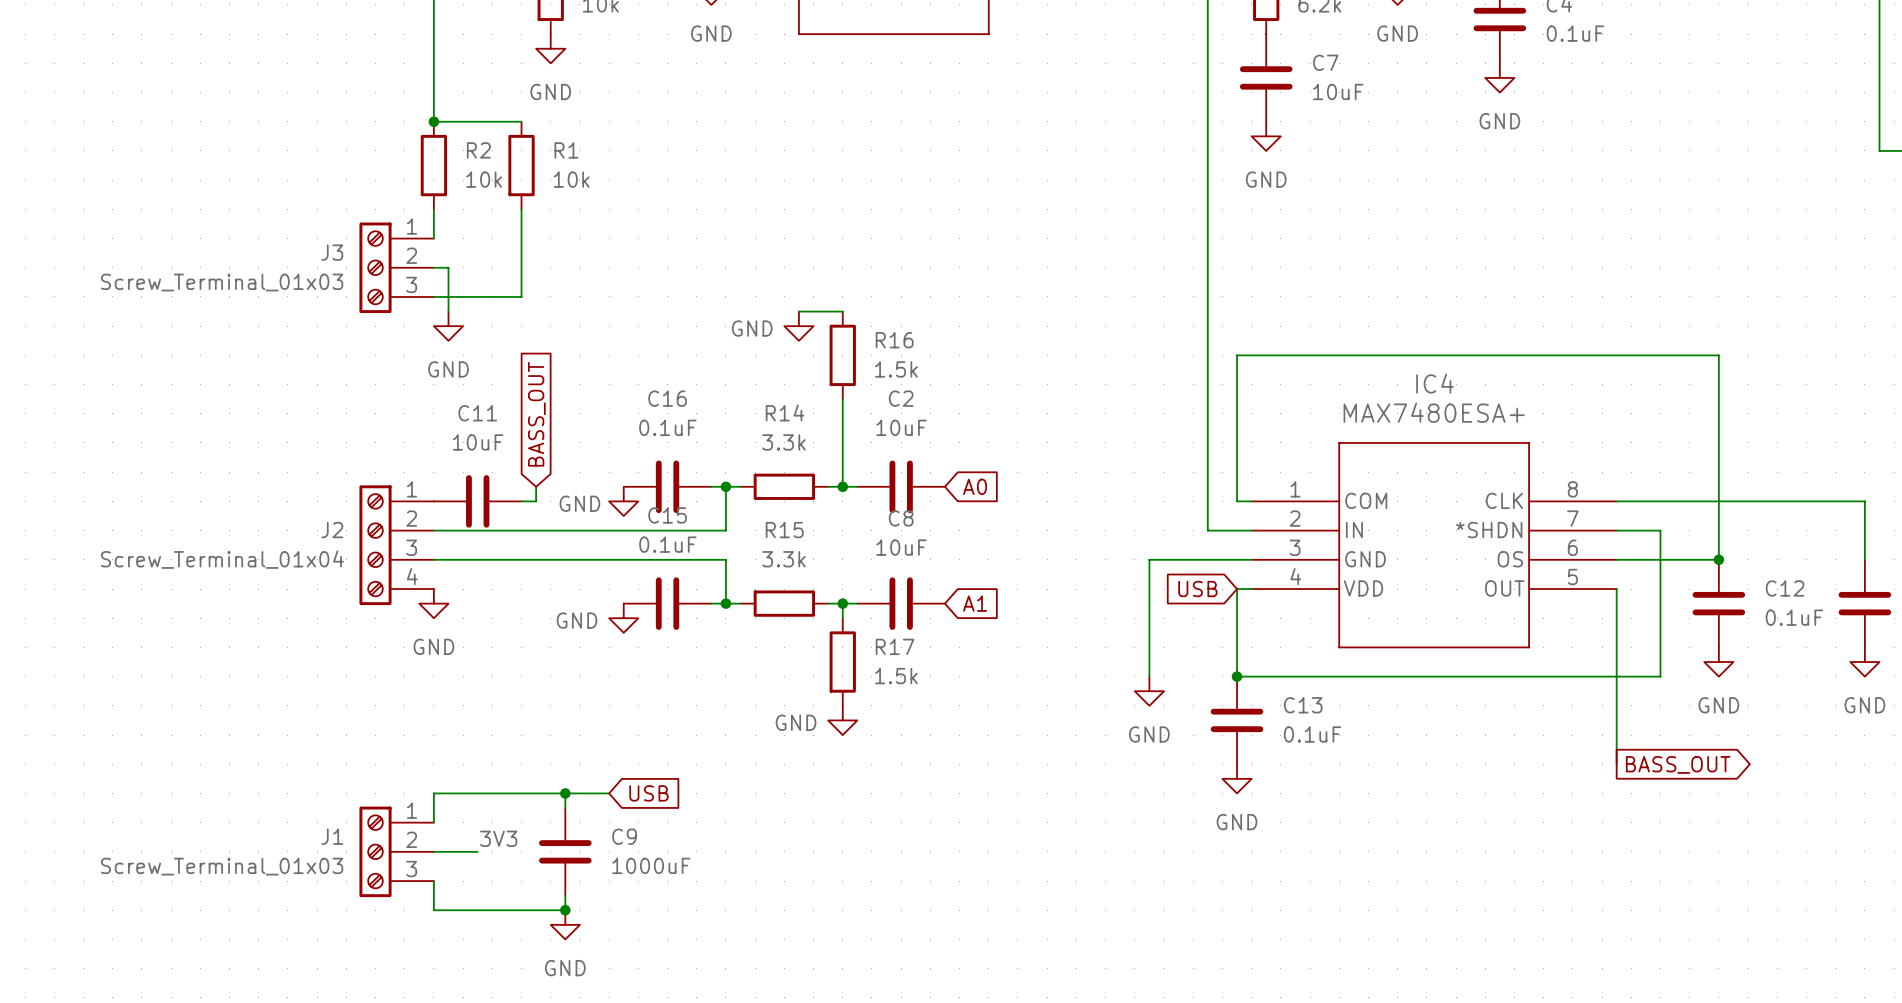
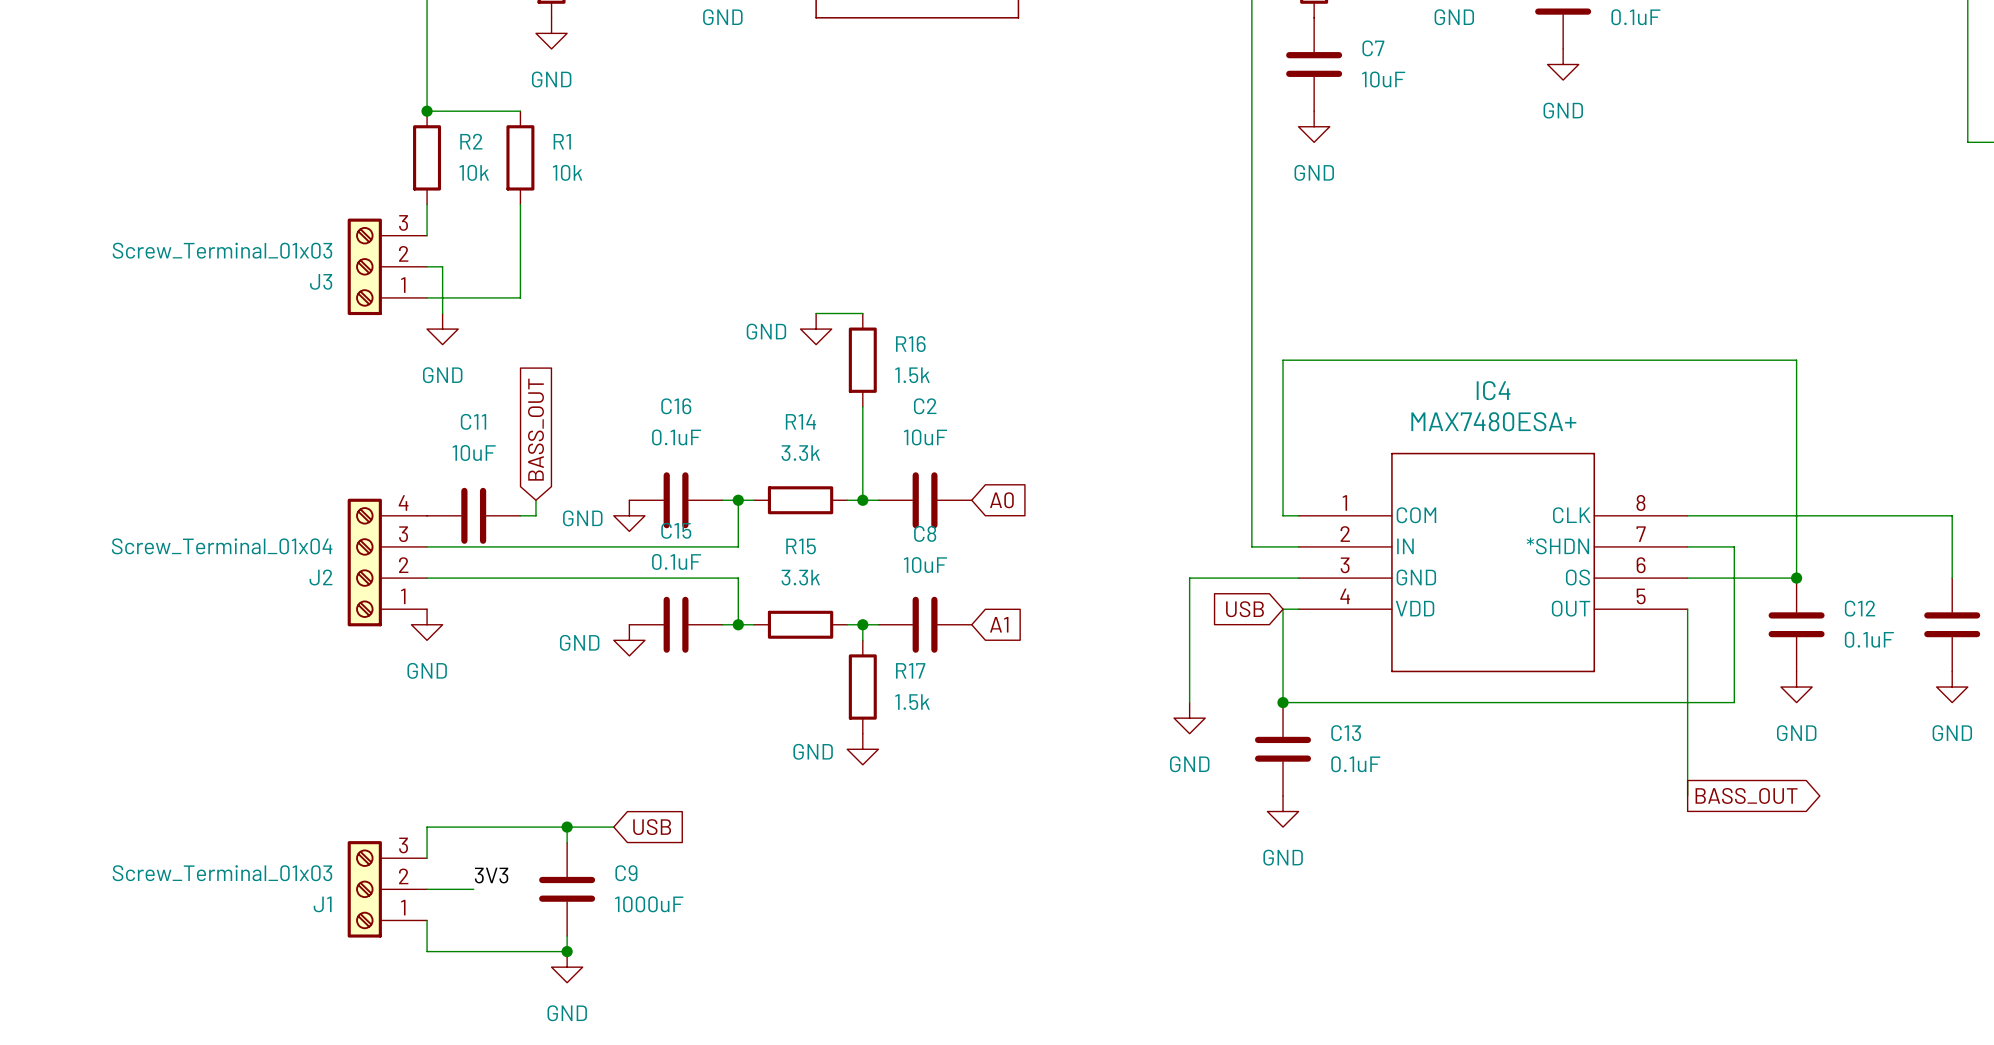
J3 flip: as is (375, 267) -> up-down (364, 266)
J2 flip: as is (375, 545) -> up-down (364, 562)
J1 flip: as is (375, 851) -> up-down (364, 889)

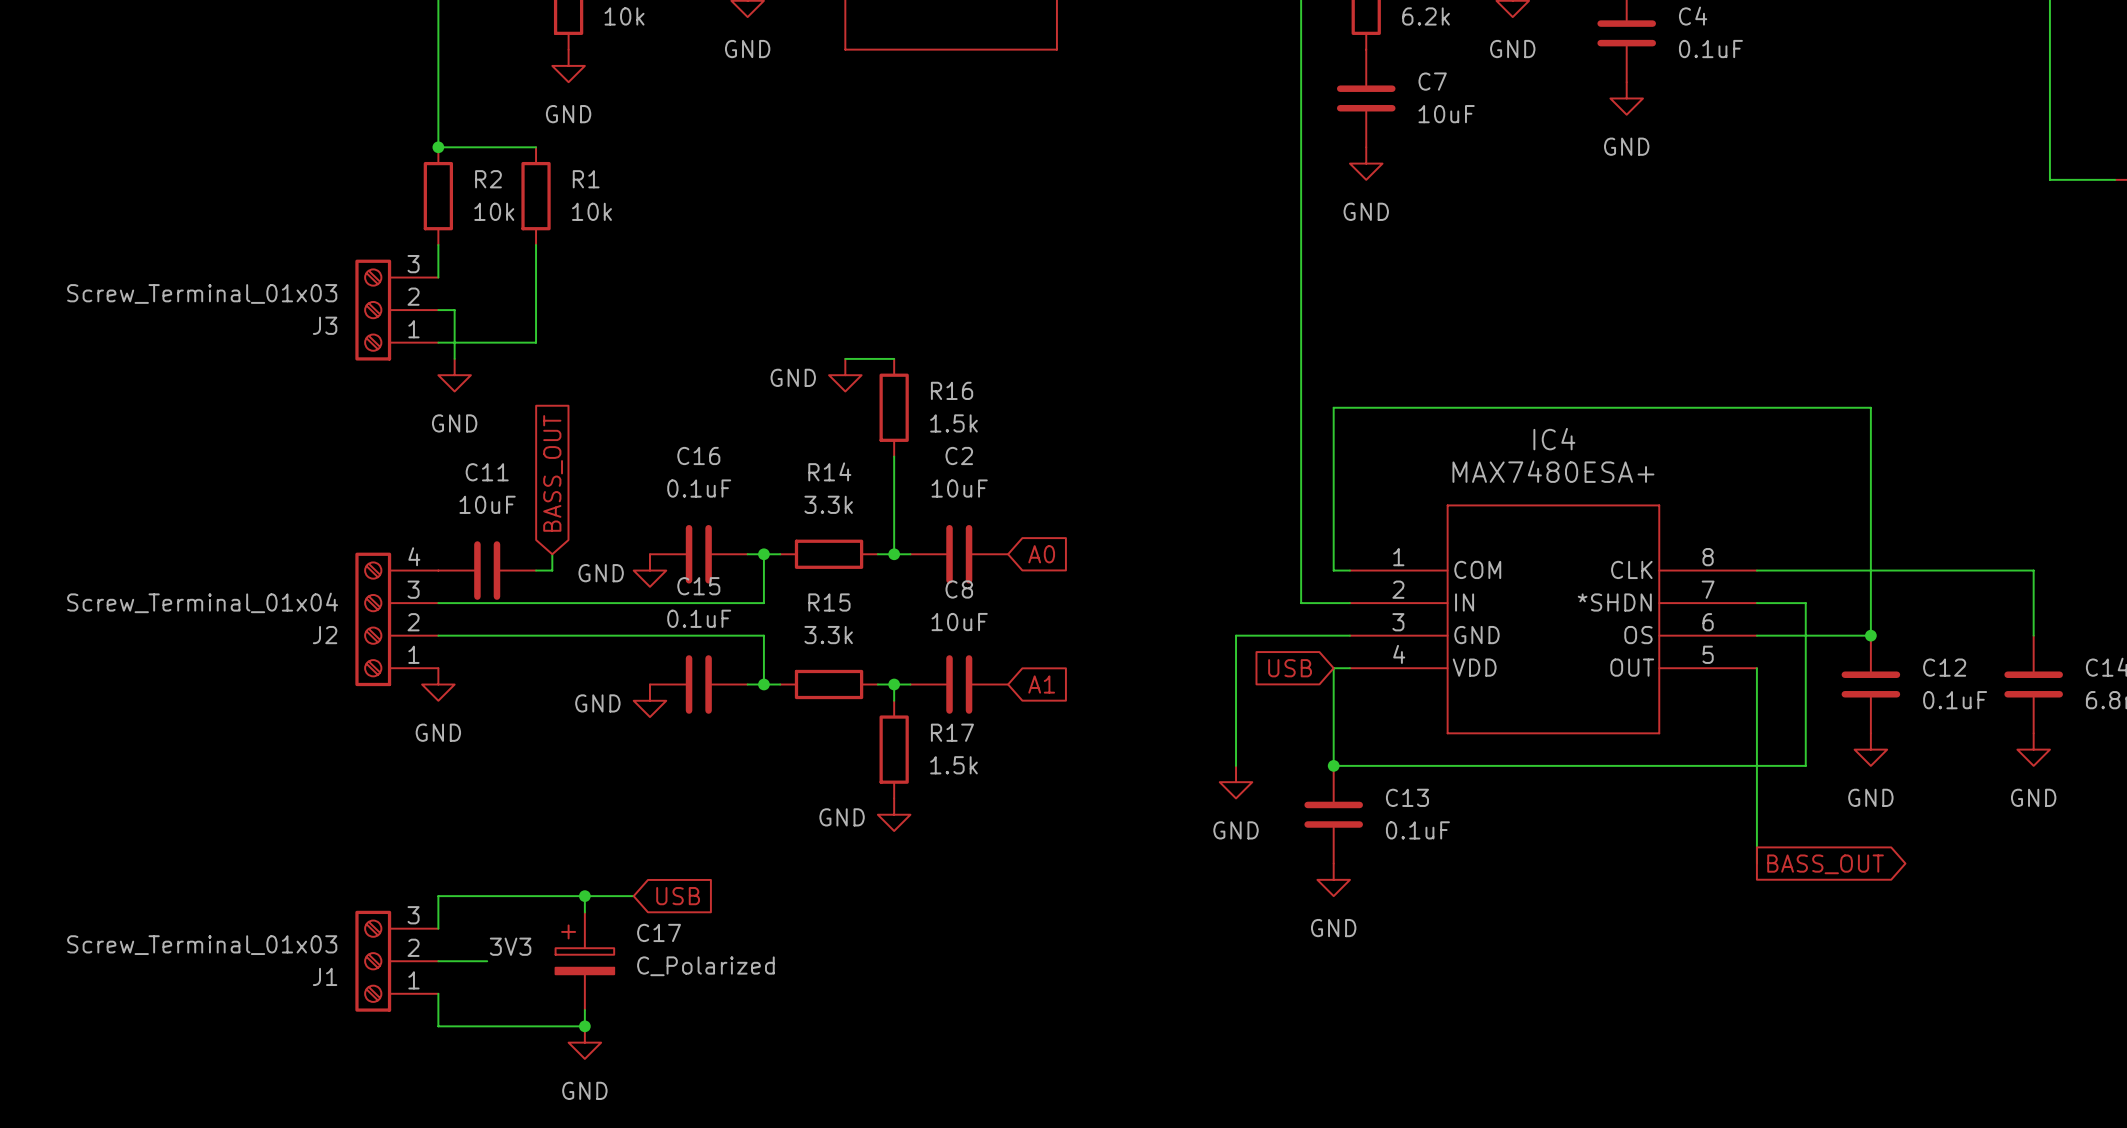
C9: 1000uF (567, 889) -> none
C17: none -> C_Polarized (584, 961)

